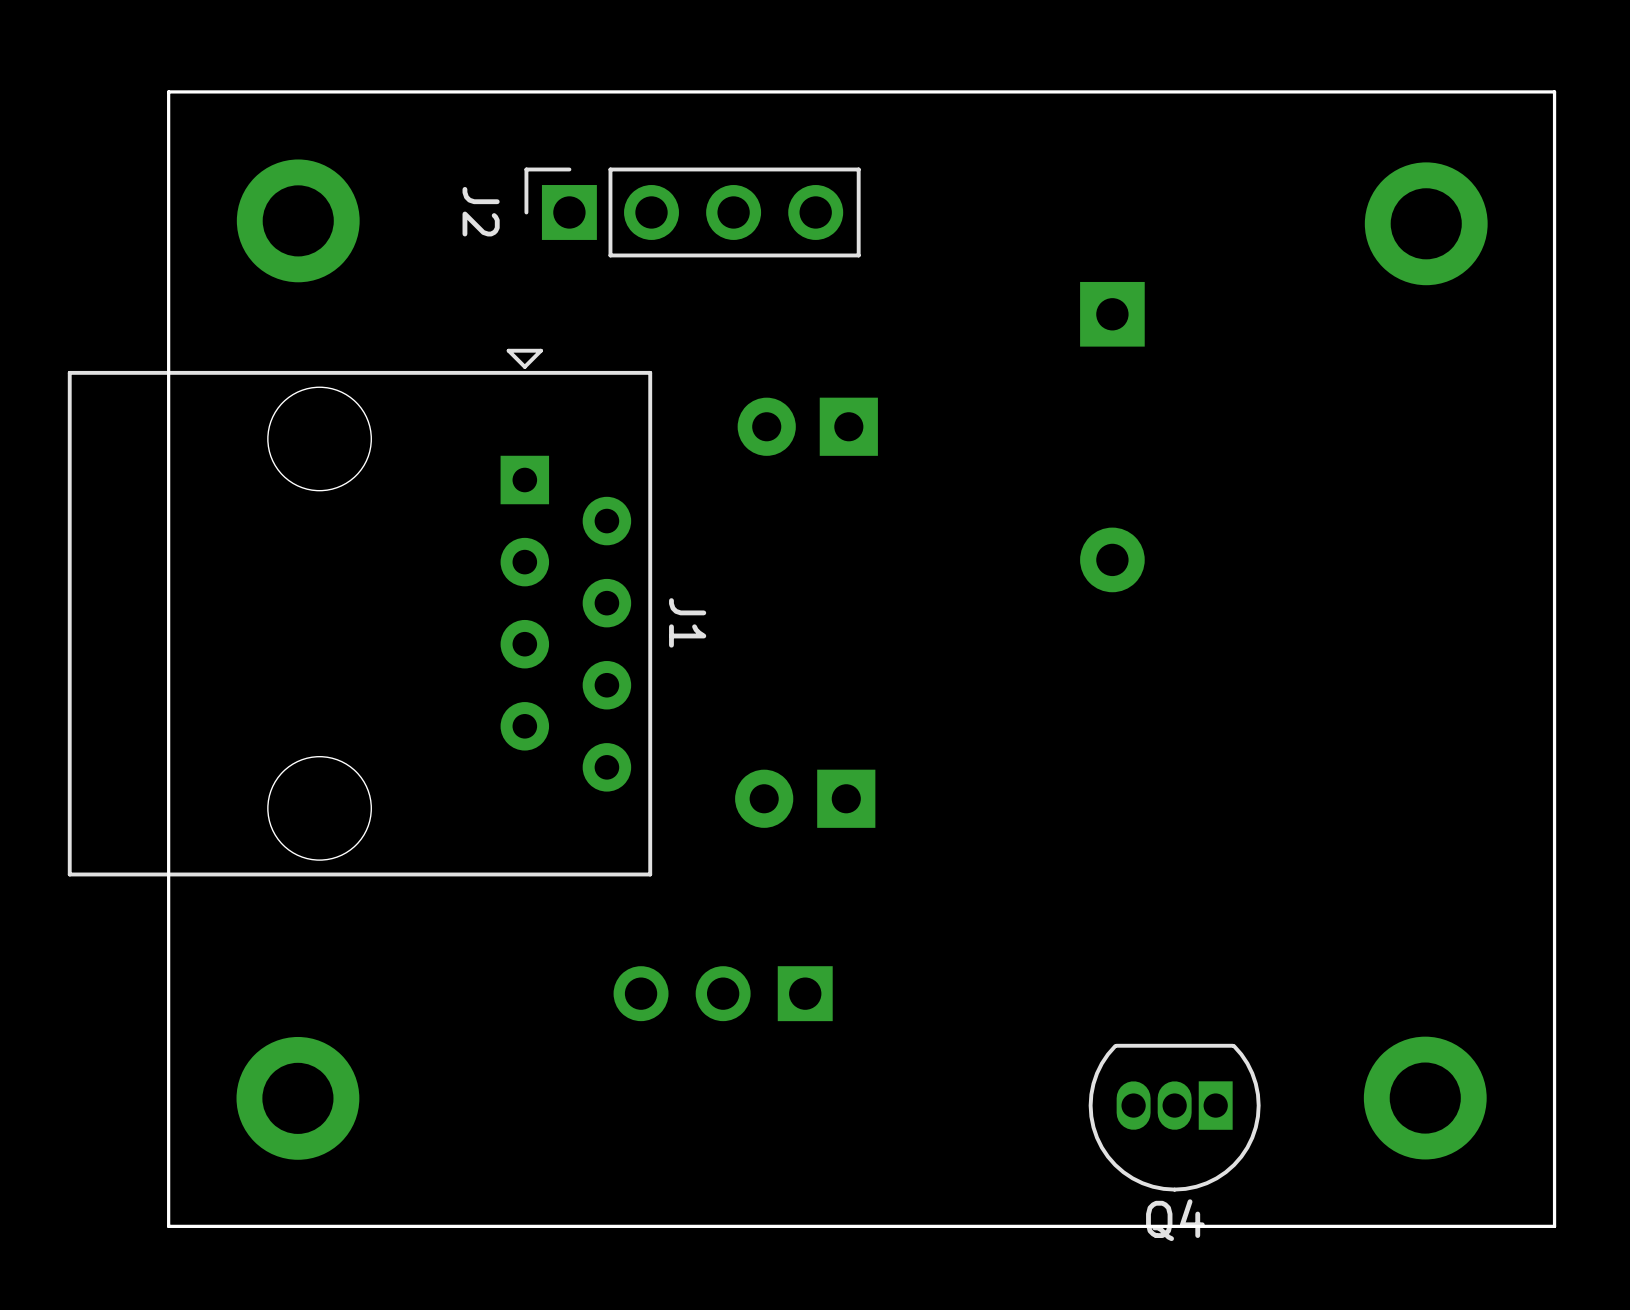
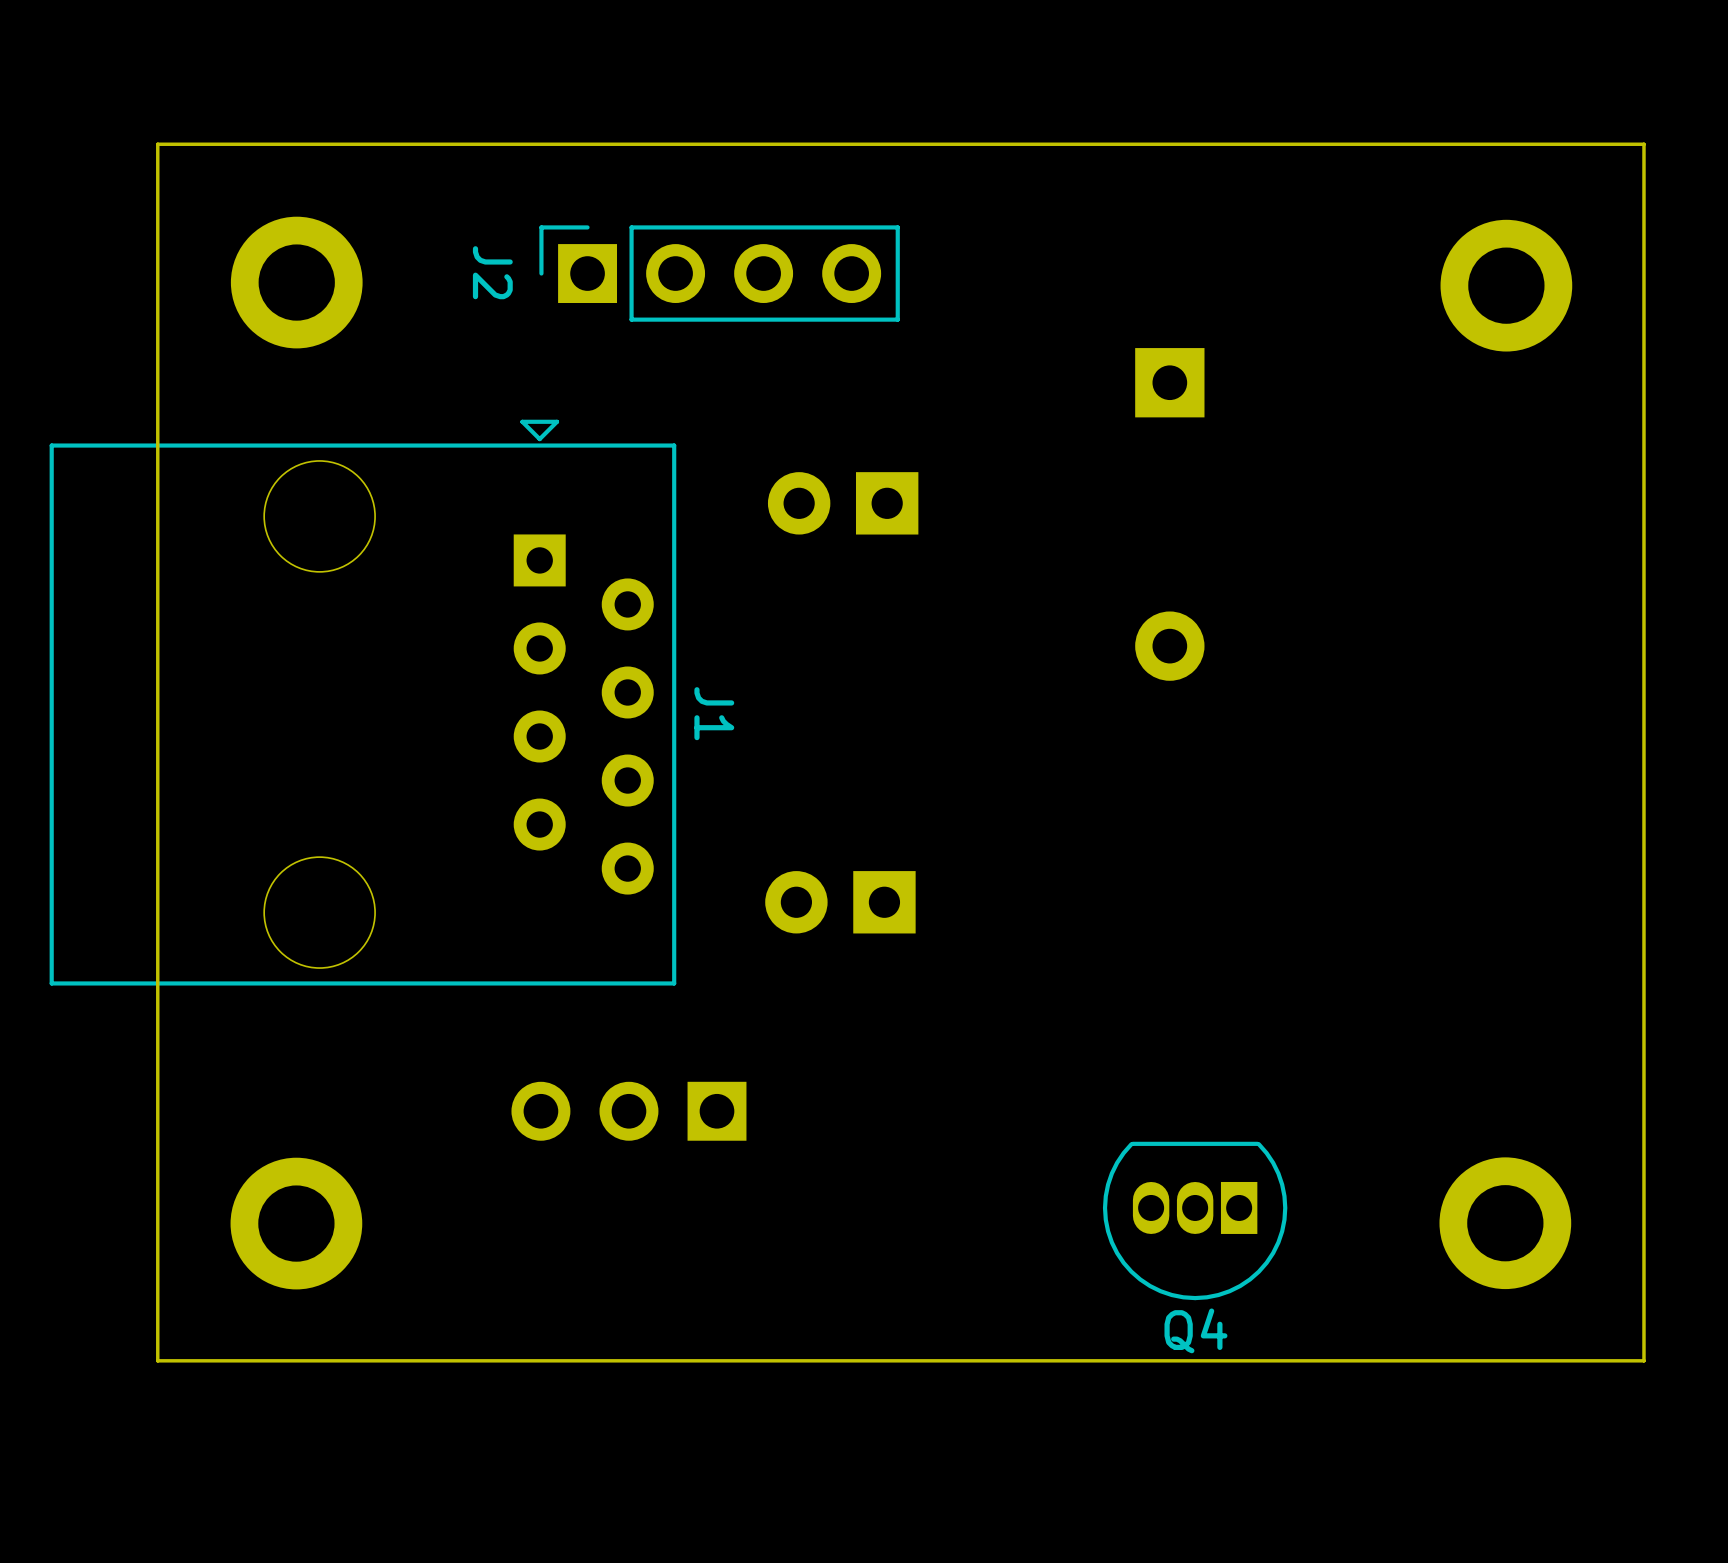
part position: (723, 993) -> (628, 1111)
Q4 position: (1174, 1117) -> (1195, 1220)

